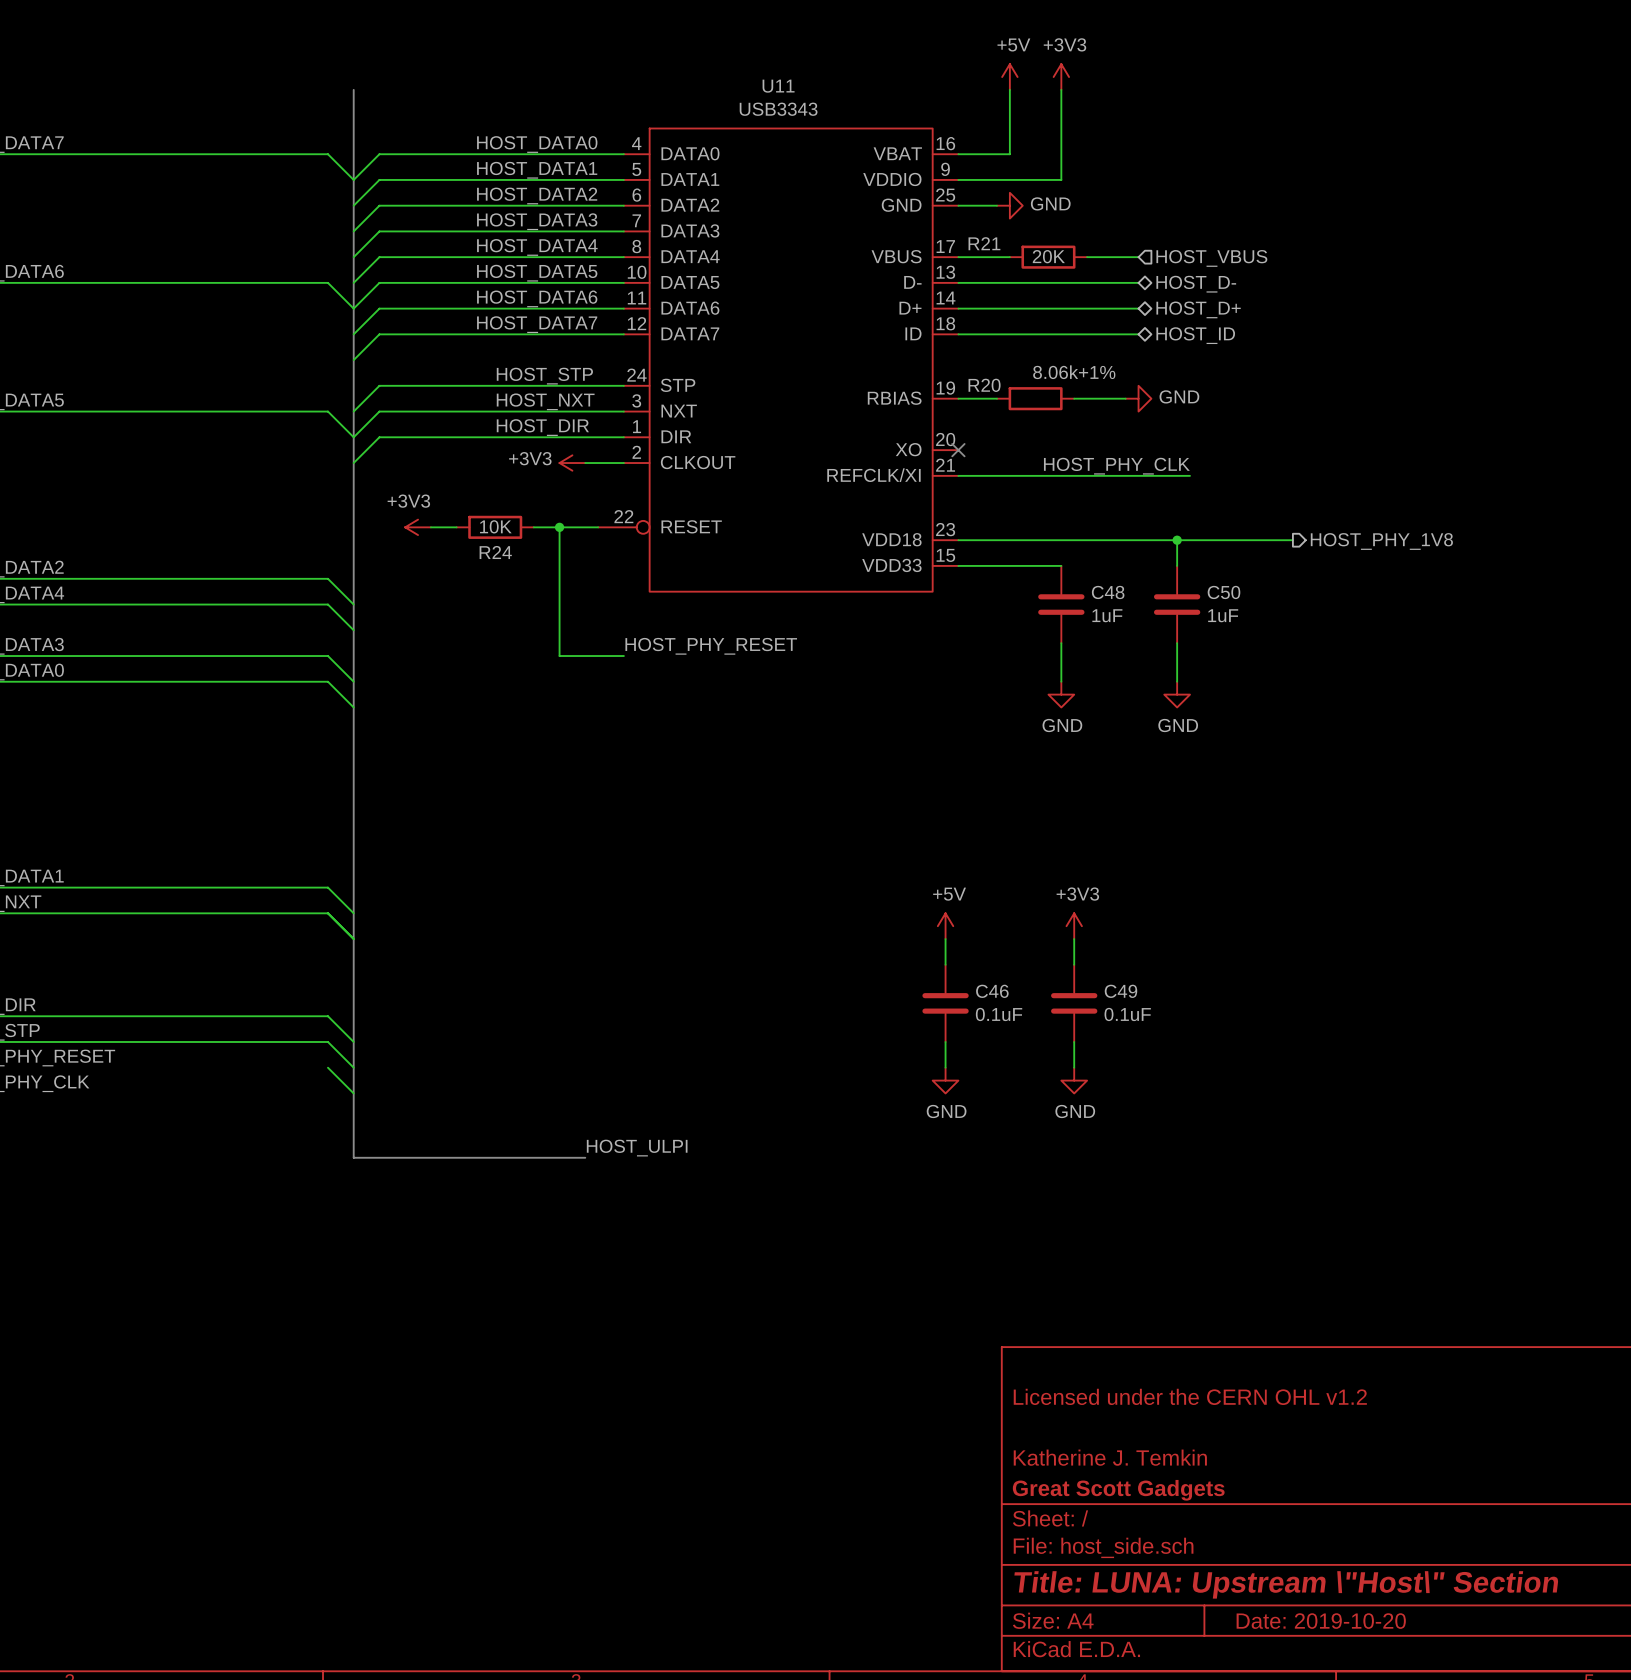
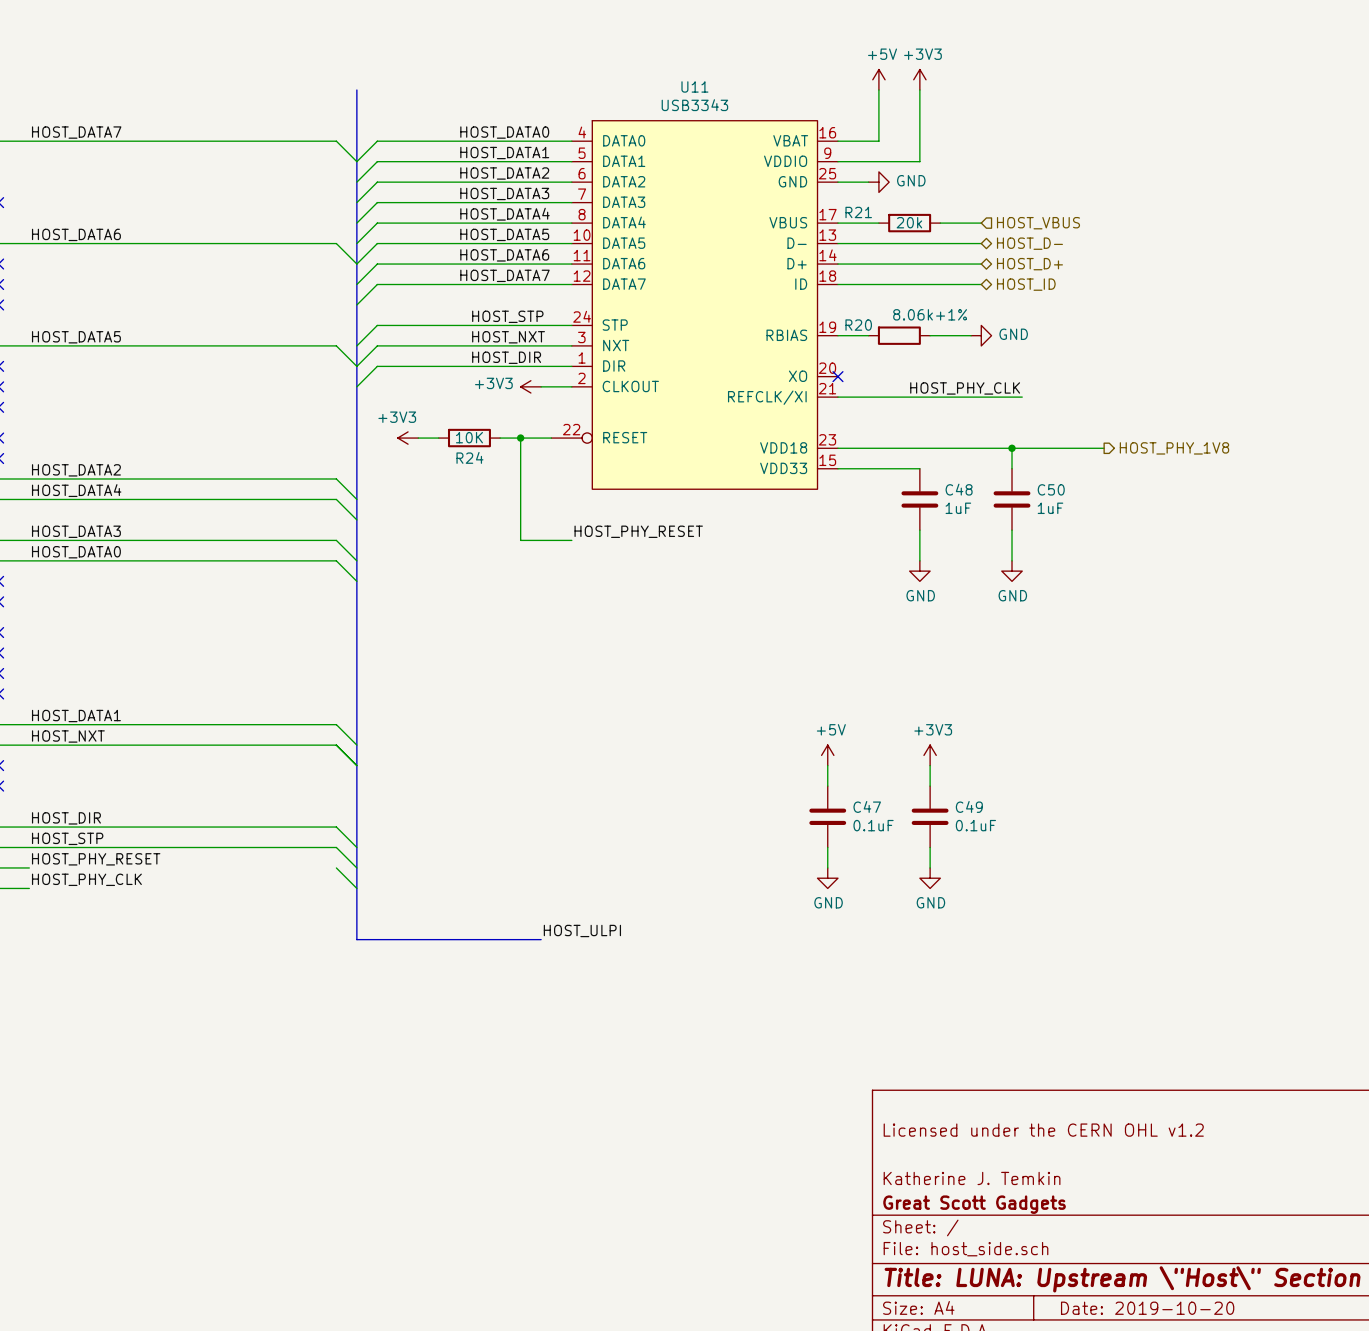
R21 value: 20K (1048, 256) -> 20k (909, 222)
C46 name: C46 (992, 991) -> C47 (867, 806)

